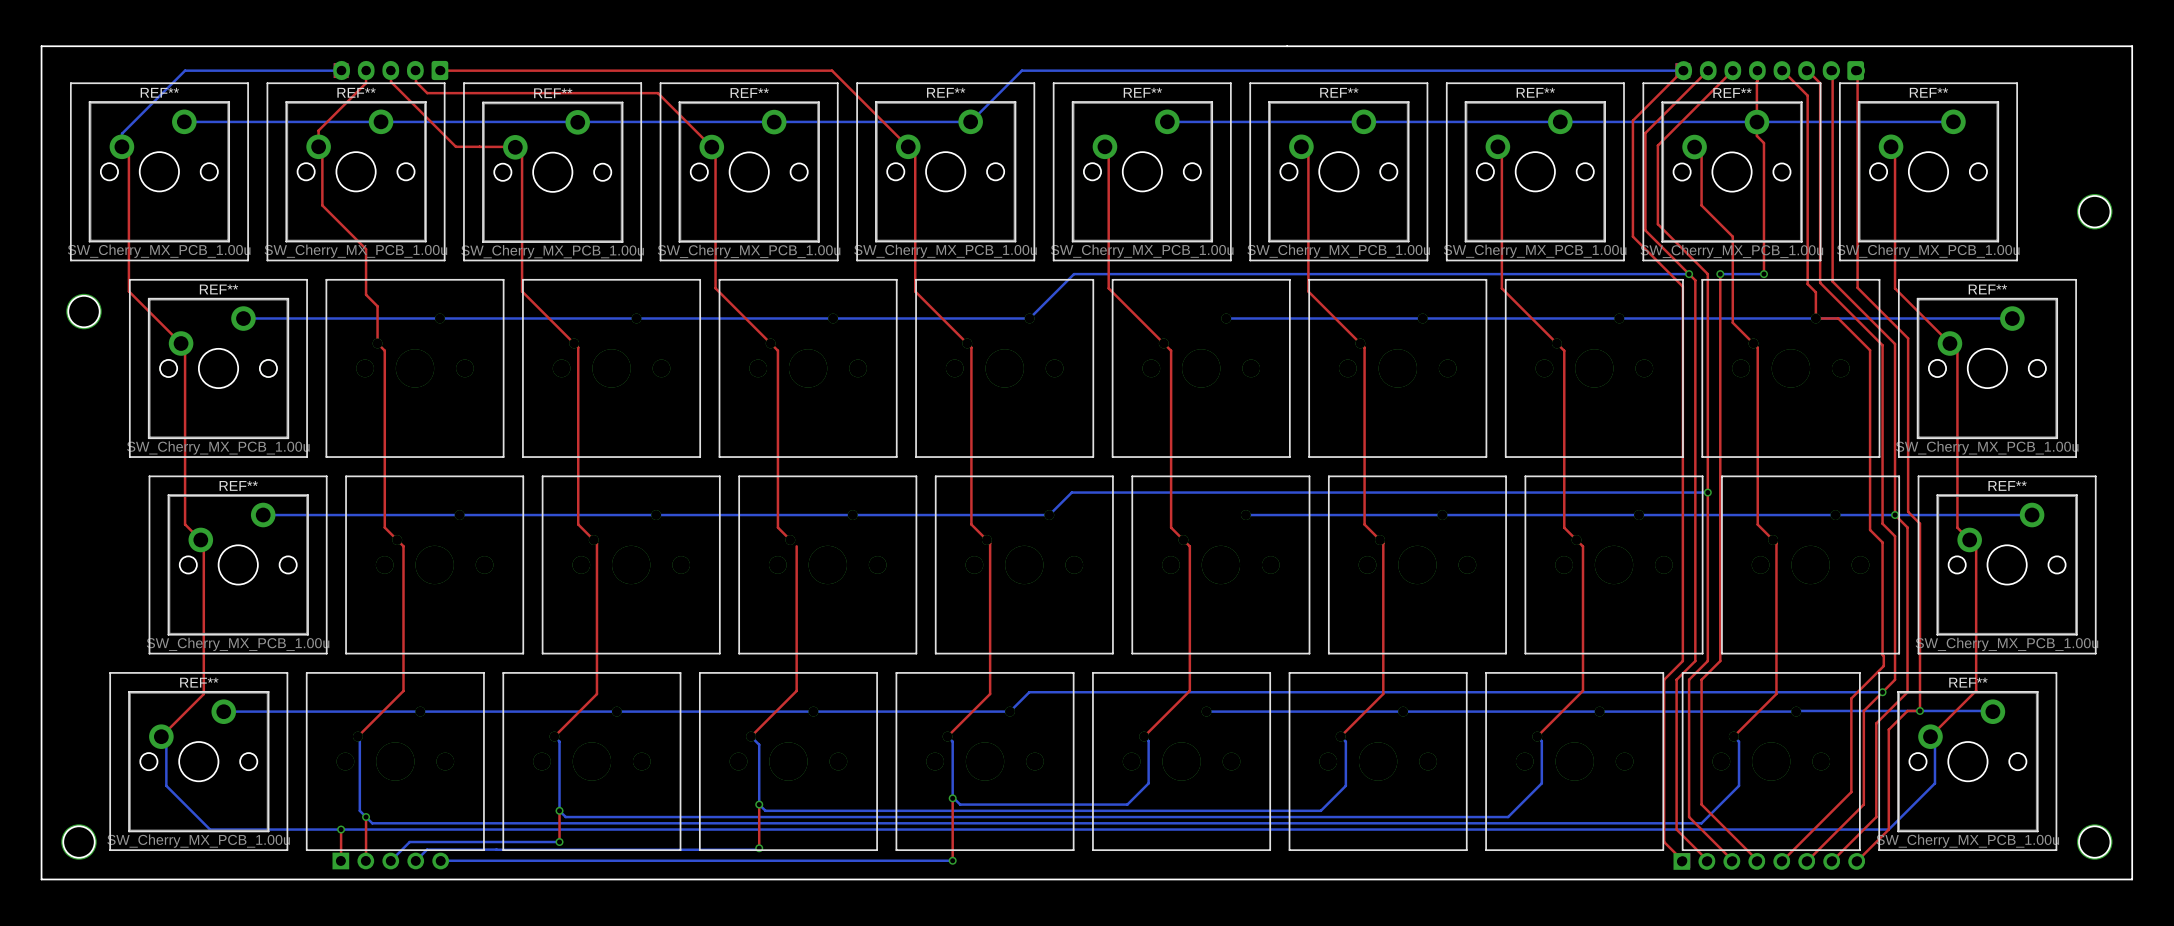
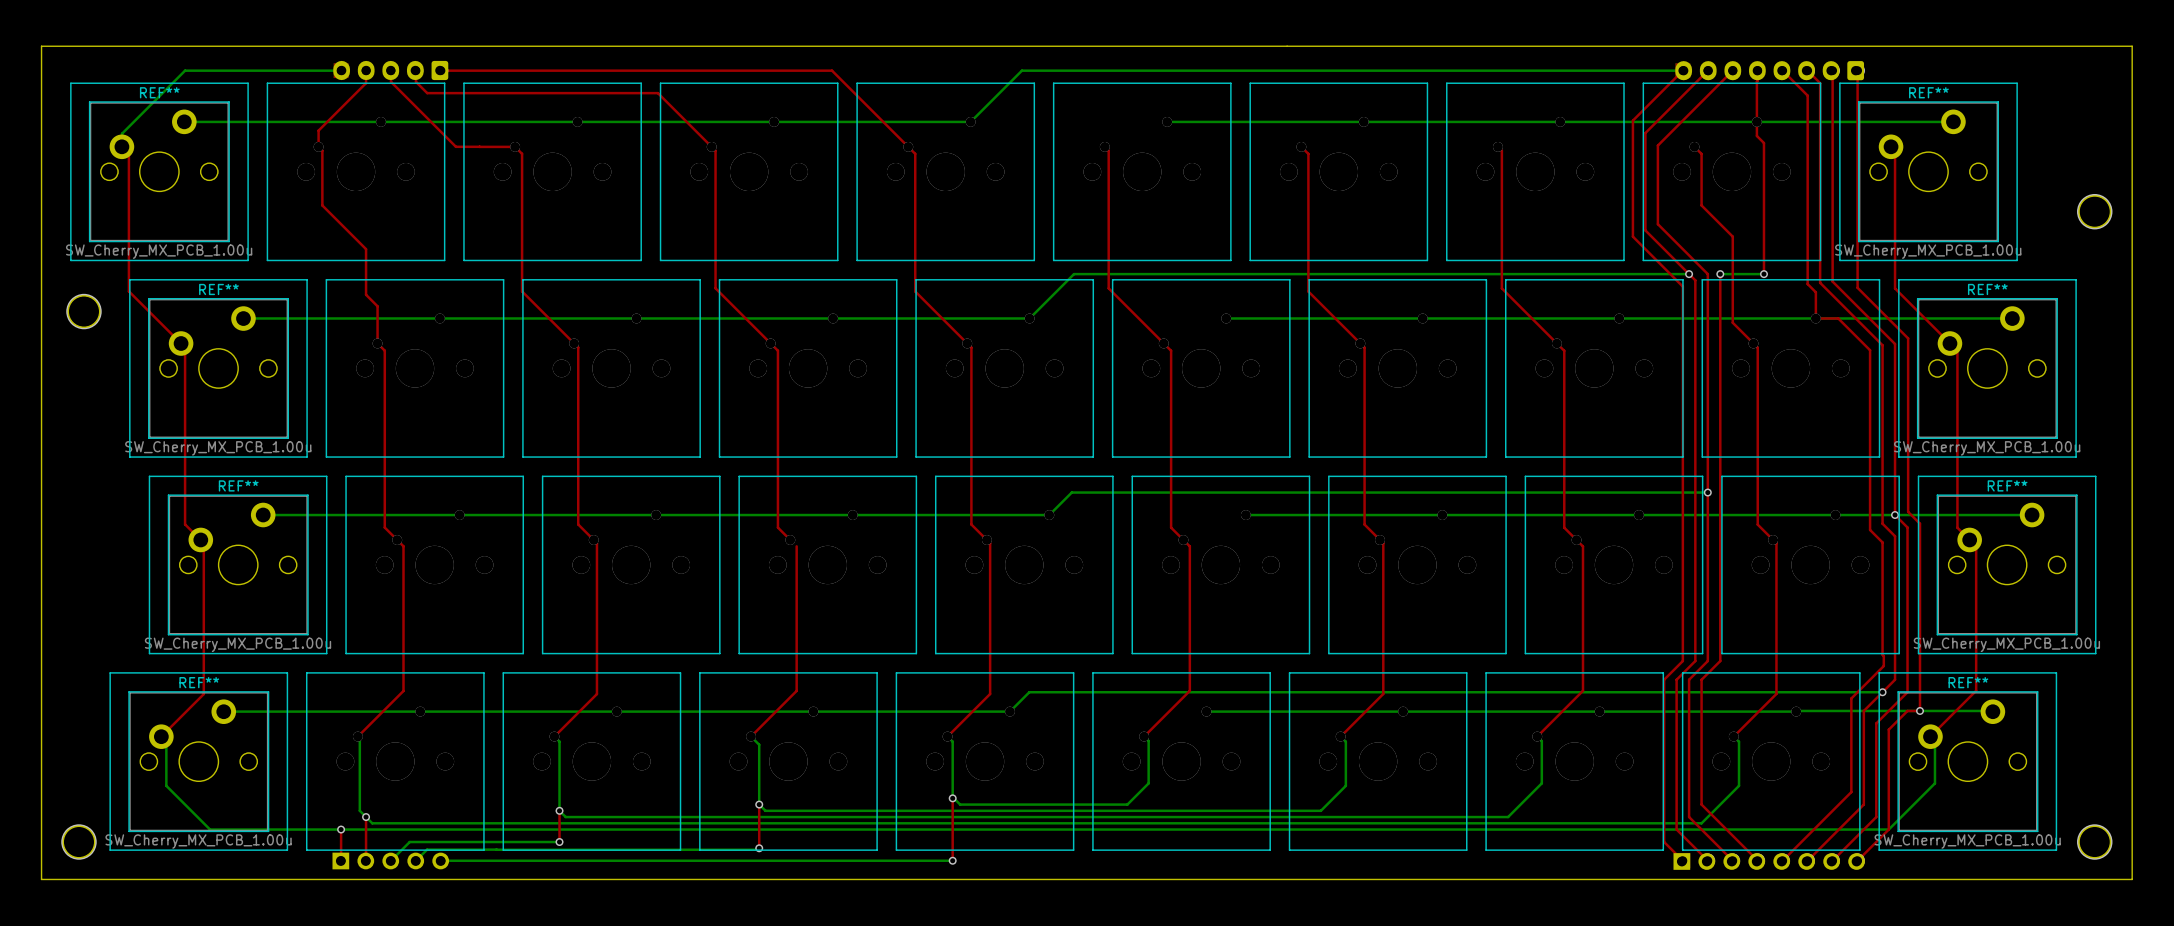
REF**: SW_Cherry_MX_PCB_1.00u (356, 171) -> none
REF**: SW_Cherry_MX_PCB_1.00u (945, 171) -> none
REF**: SW_Cherry_MX_PCB_1.00u (1142, 171) -> none
REF**: SW_Cherry_MX_PCB_1.00u (1338, 171) -> none
REF**: SW_Cherry_MX_PCB_1.00u (1535, 171) -> none
REF**: SW_Cherry_MX_PCB_1.00u (552, 172) -> none
REF**: SW_Cherry_MX_PCB_1.00u (749, 172) -> none
REF**: SW_Cherry_MX_PCB_1.00u (1732, 172) -> none

